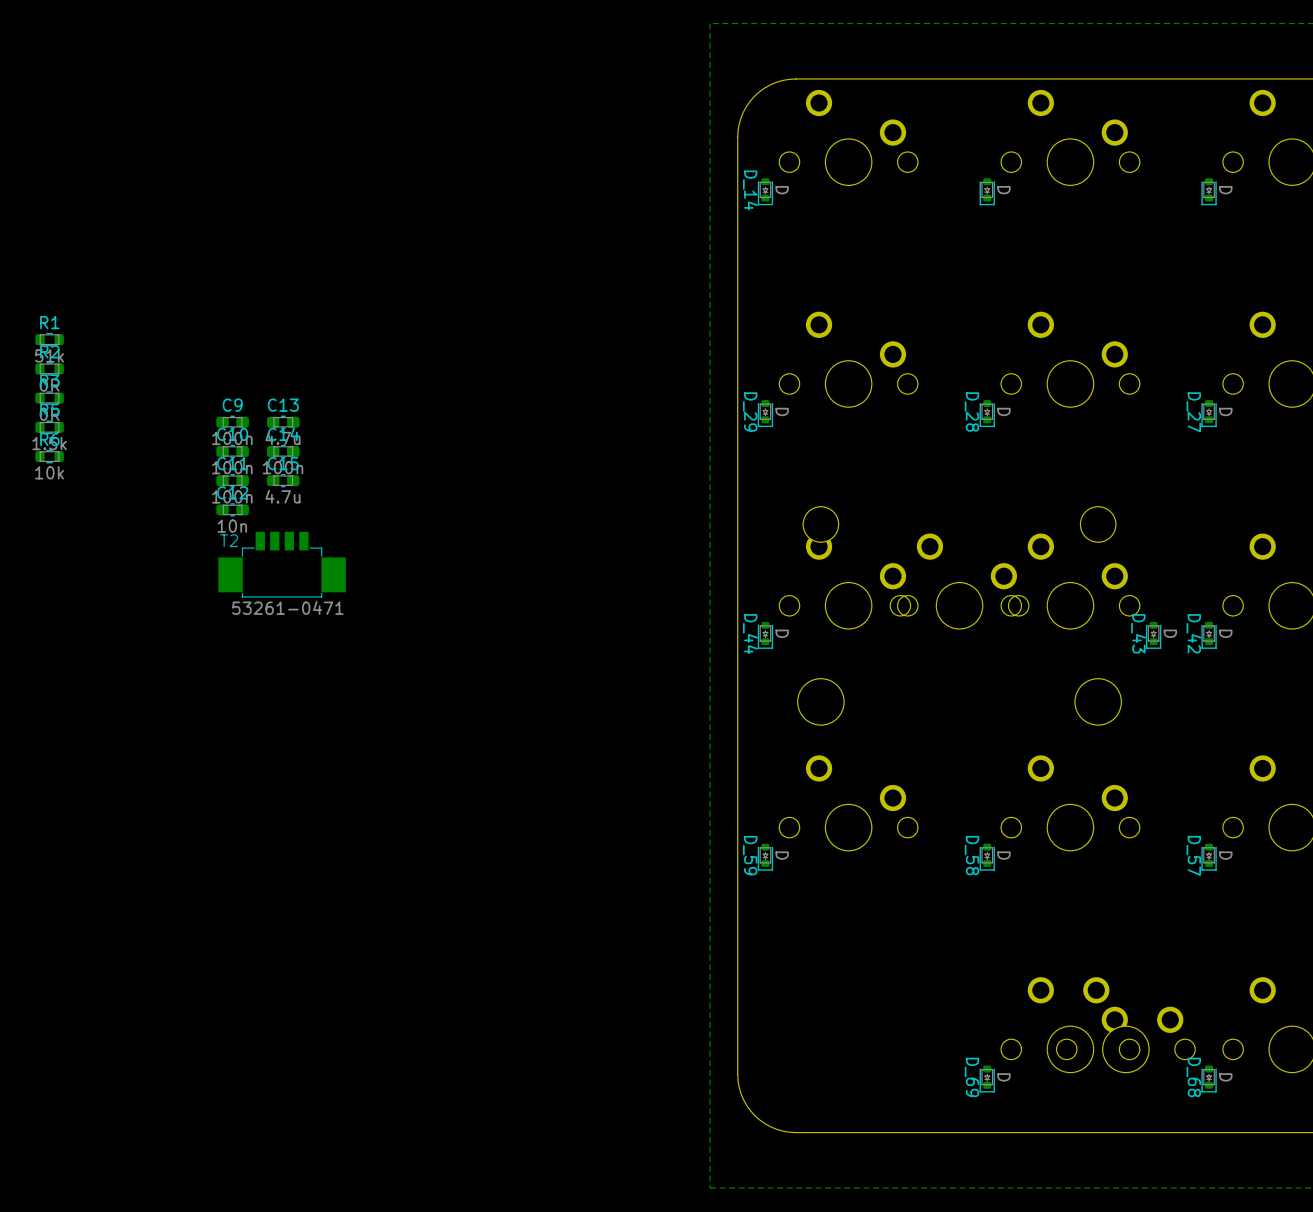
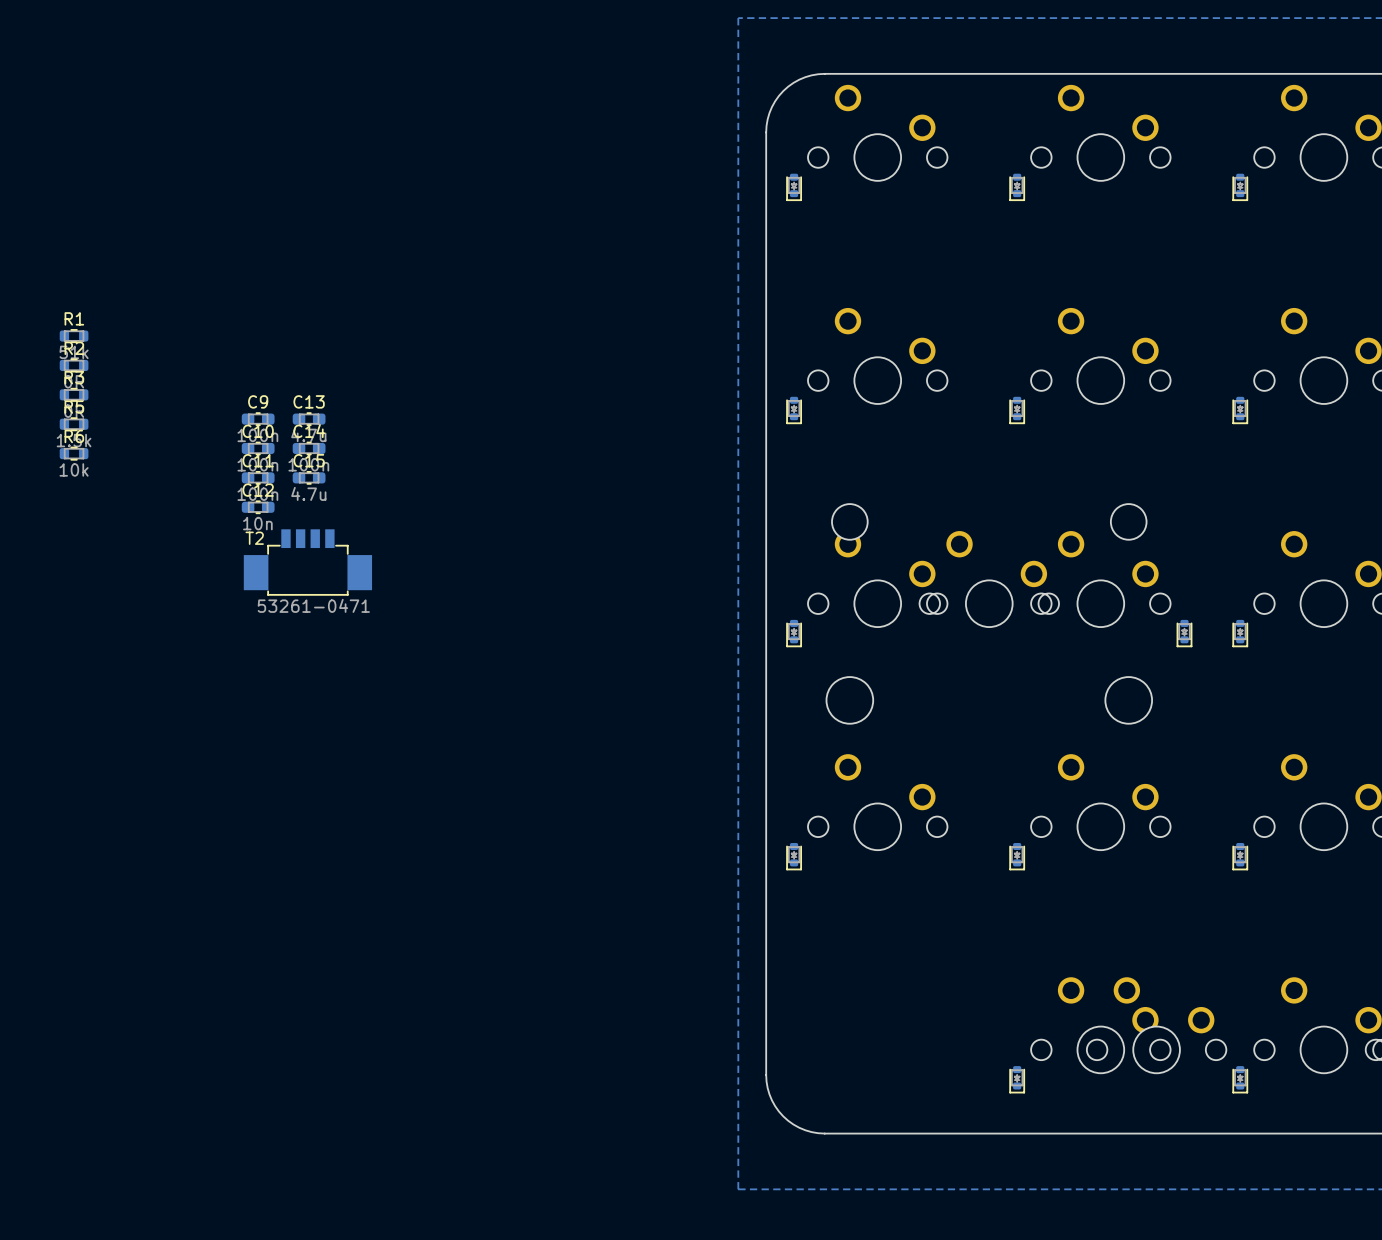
D_14 name: D_14 (750, 190) -> none
D_14 value: D (782, 190) -> none
part value: D (1003, 190) -> none
part value: D (1225, 190) -> none
D_29 name: D_29 (750, 411) -> none
D_29 value: D (782, 411) -> none
D_28 name: D_28 (972, 411) -> none
D_28 value: D (1003, 411) -> none
D_27 value: D (1225, 411) -> none
D_27 name: D_27 (1193, 412) -> none
D_44 value: D (782, 633) -> none
D_43 name: D_43 (1138, 633) -> none
D_43 value: D (1170, 633) -> none
D_42 name: D_42 (1194, 633) -> none
D_42 value: D (1225, 633) -> none
D_44 name: D_44 (750, 634) -> none
D_59 name: D_59 (750, 855) -> none
D_59 value: D (782, 855) -> none
D_58 name: D_58 (972, 855) -> none
D_58 value: D (1003, 855) -> none
D_57 name: D_57 (1193, 855) -> none
D_57 value: D (1225, 855) -> none
D_69 name: D_69 (972, 1077) -> none
D_69 value: D (1003, 1077) -> none
D_68 name: D_68 (1193, 1077) -> none
D_68 value: D (1225, 1077) -> none

